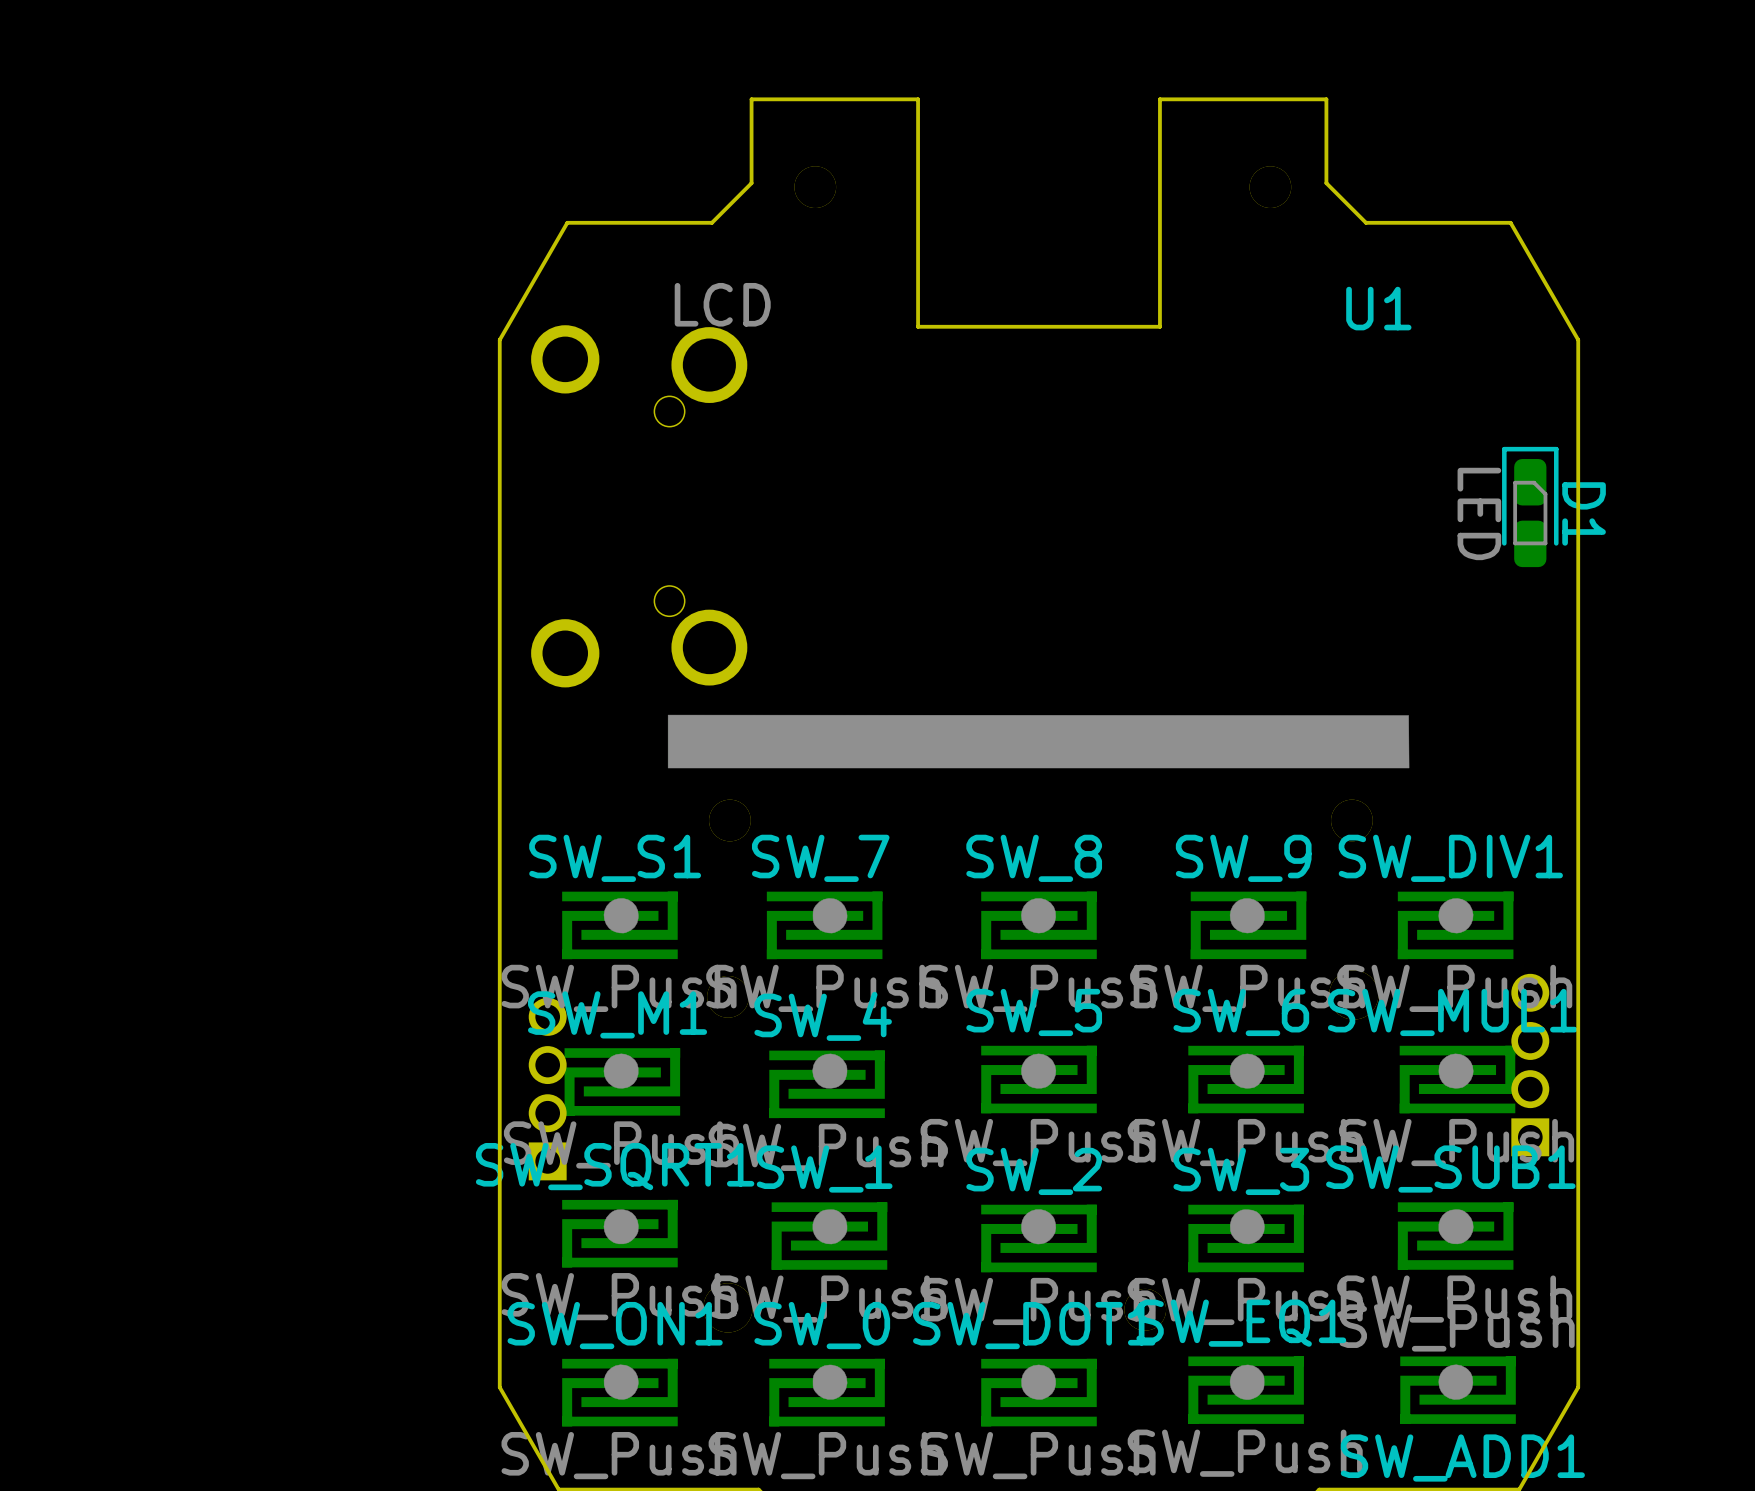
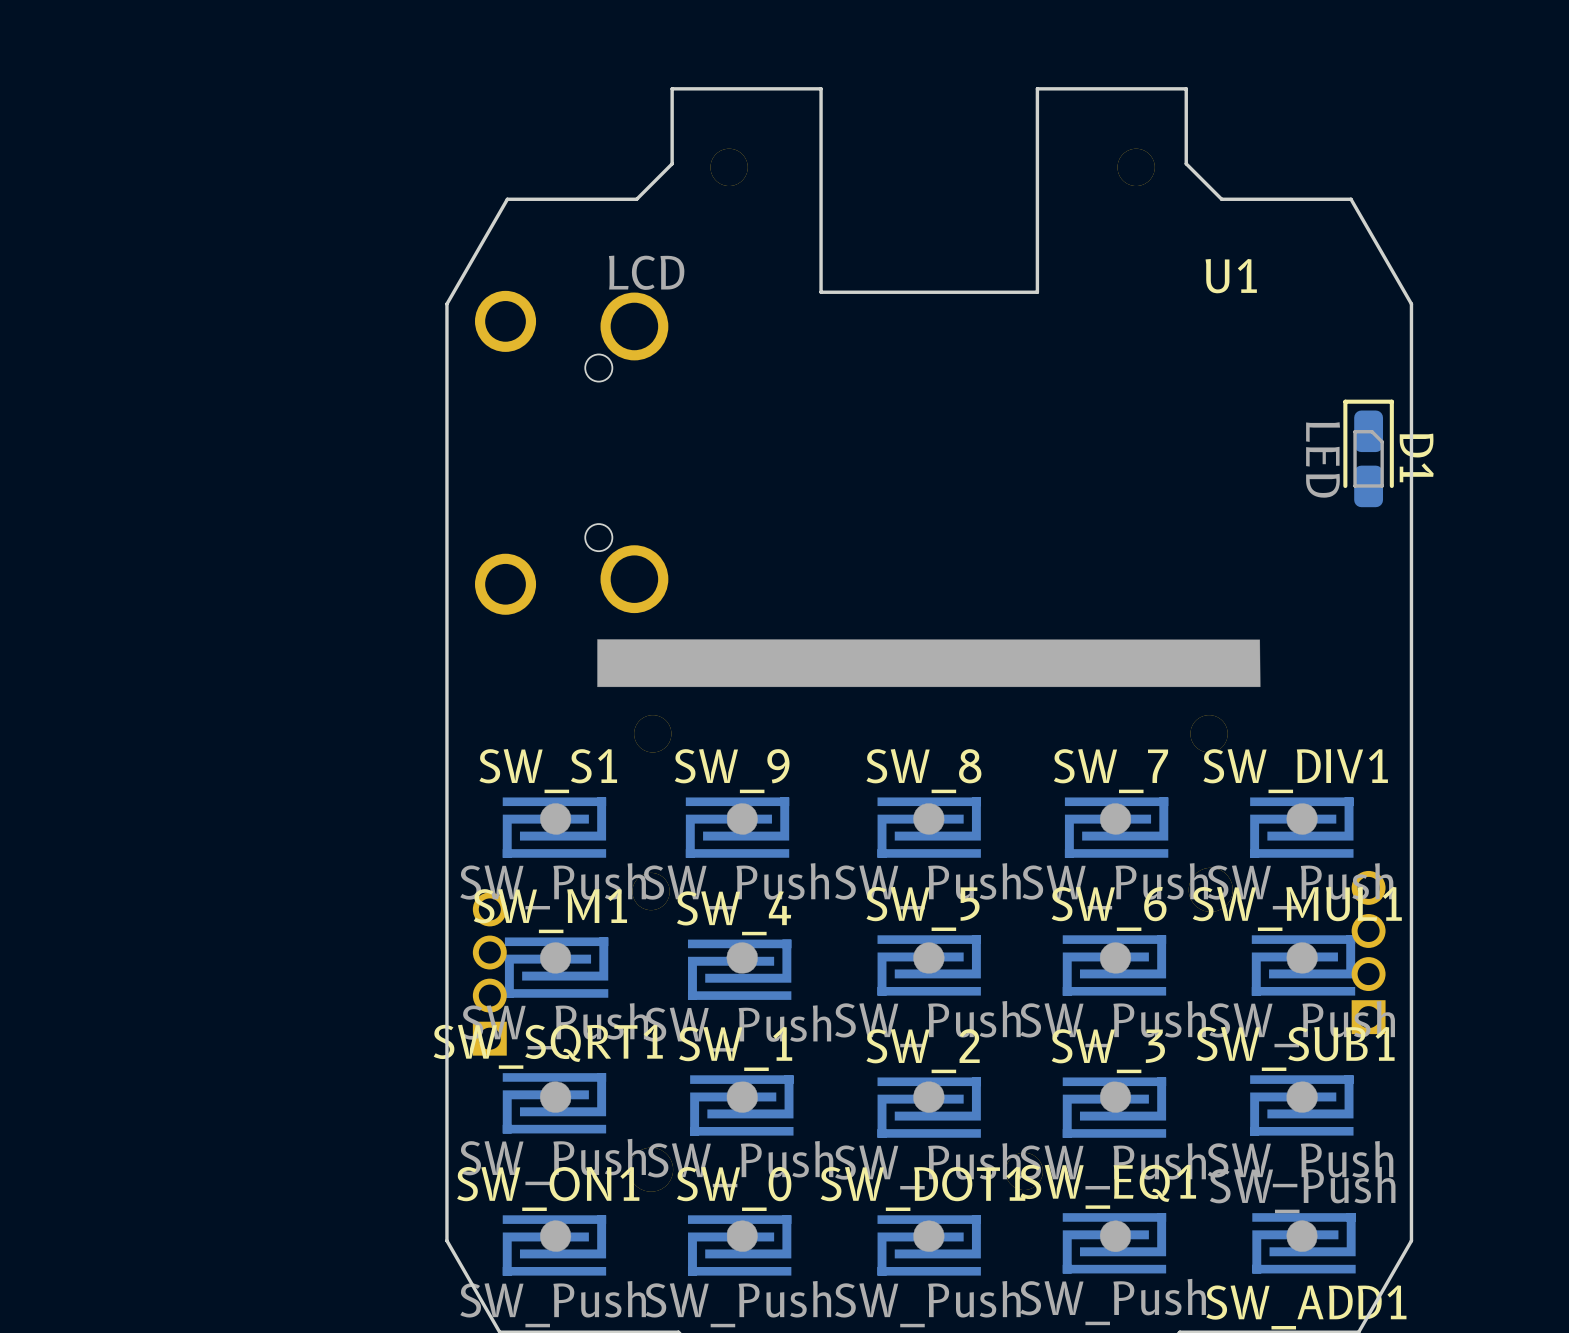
SW_7 name: SW_7 (820, 858) -> SW_9 (732, 771)
SW_9 name: SW_9 (1243, 858) -> SW_7 (1110, 771)

